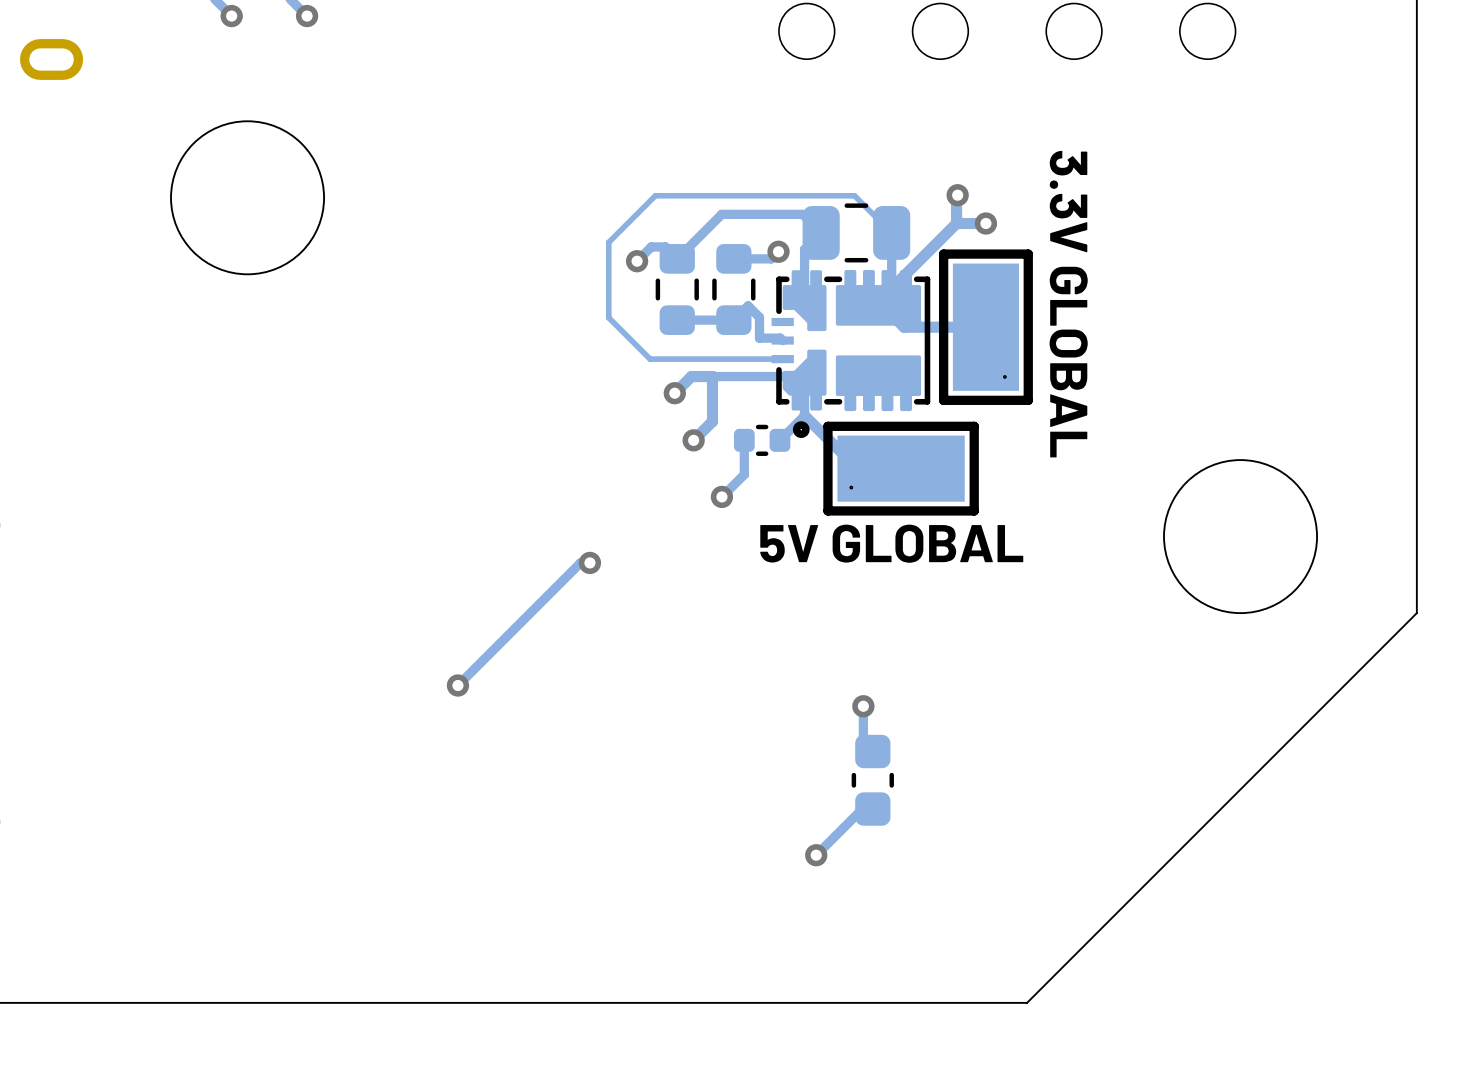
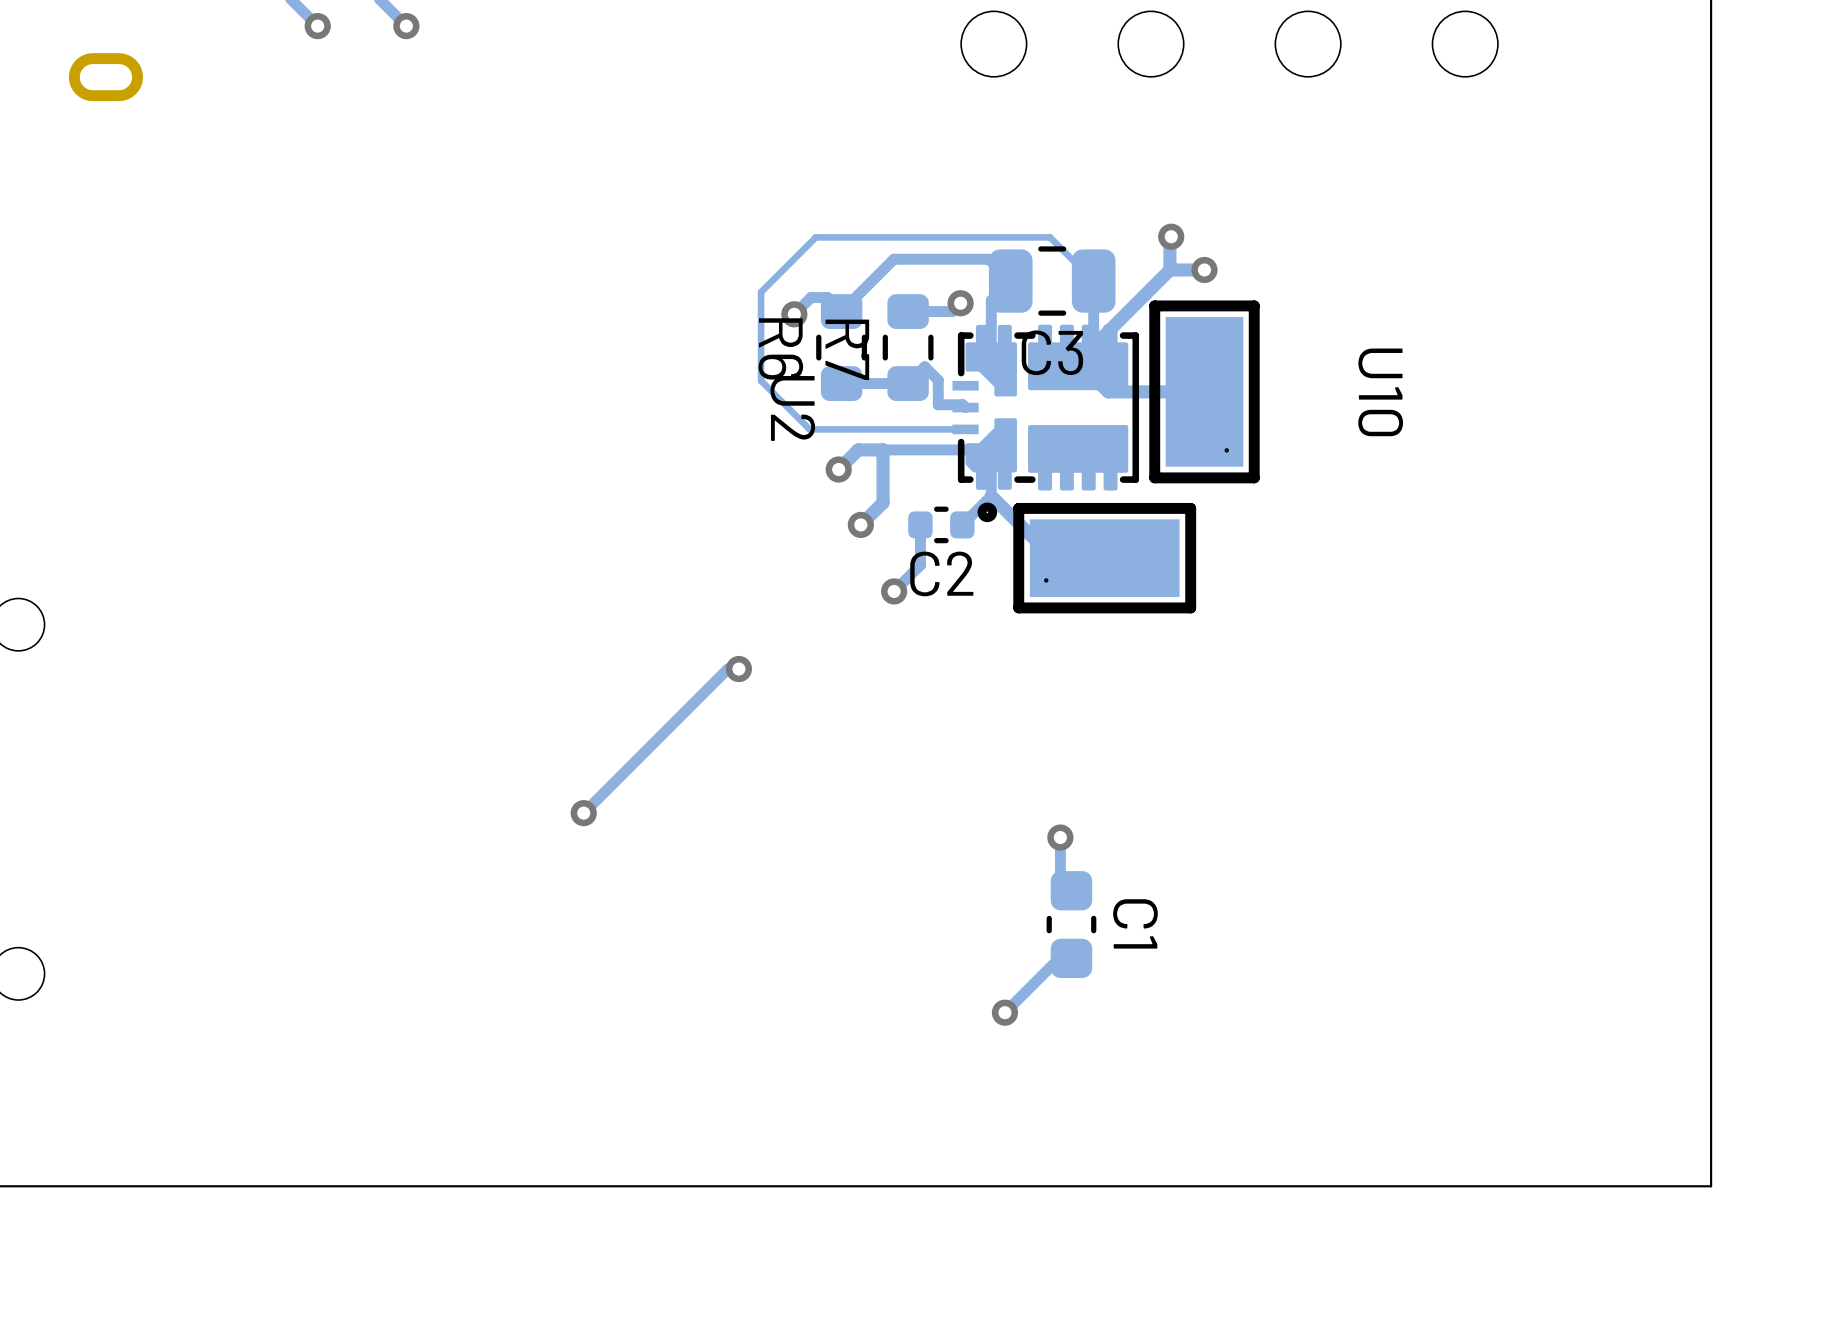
round board edge: [170, 120, 325, 276] -> none
R6 name: none -> R6 (780, 348)
R7 name: none -> R7 (847, 349)
C3 name: none -> C3 (1052, 352)
text: 3.3V GLOBAL (1068, 304) -> none
U10 name: none -> U10 (1380, 392)
U2 name: none -> U2 (792, 408)
round board edge: [1163, 459, 1318, 615] -> none
C2 name: none -> C2 (941, 573)
text: 5V GLOBAL (891, 543) -> none
board edge: (1416, 613) (1027, 1002) -> (1711, 728) (1711, 1186) (1252, 1186)
C1 name: none -> C1 (1135, 923)

